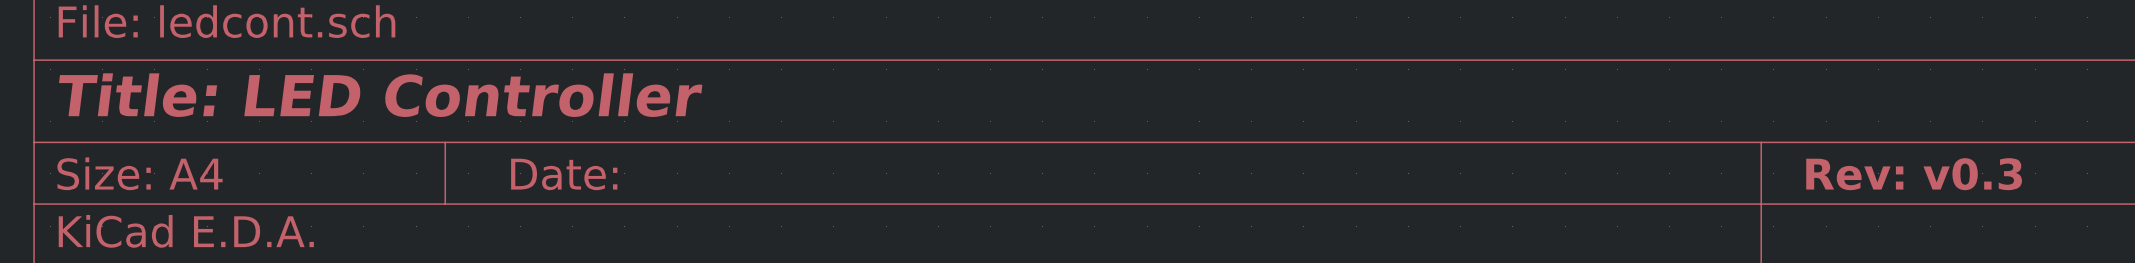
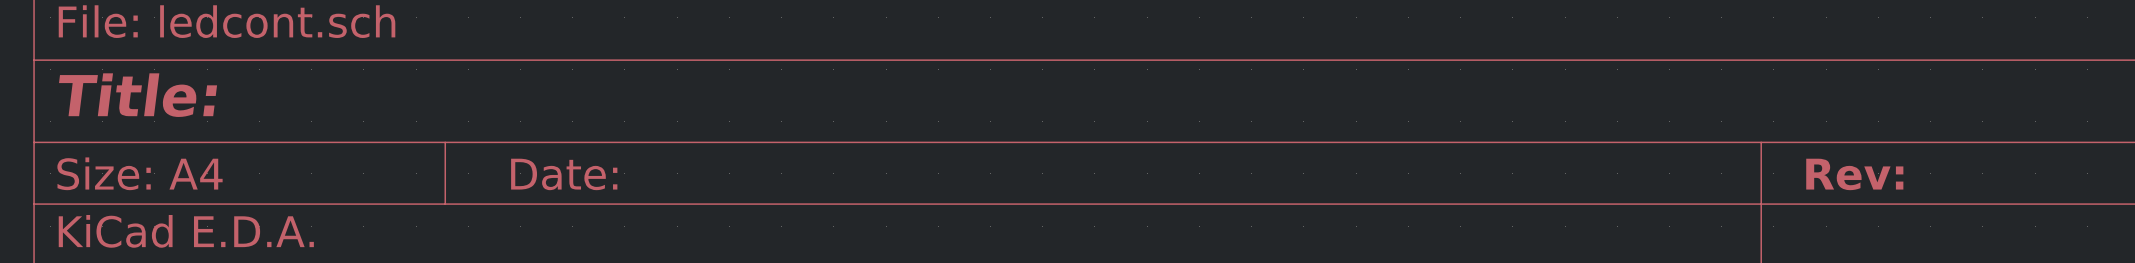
title block: Title: LED Controller (380, 95) -> Title: (138, 95)
title block: Rev: v0.3 (1914, 174) -> Rev: (1854, 174)

